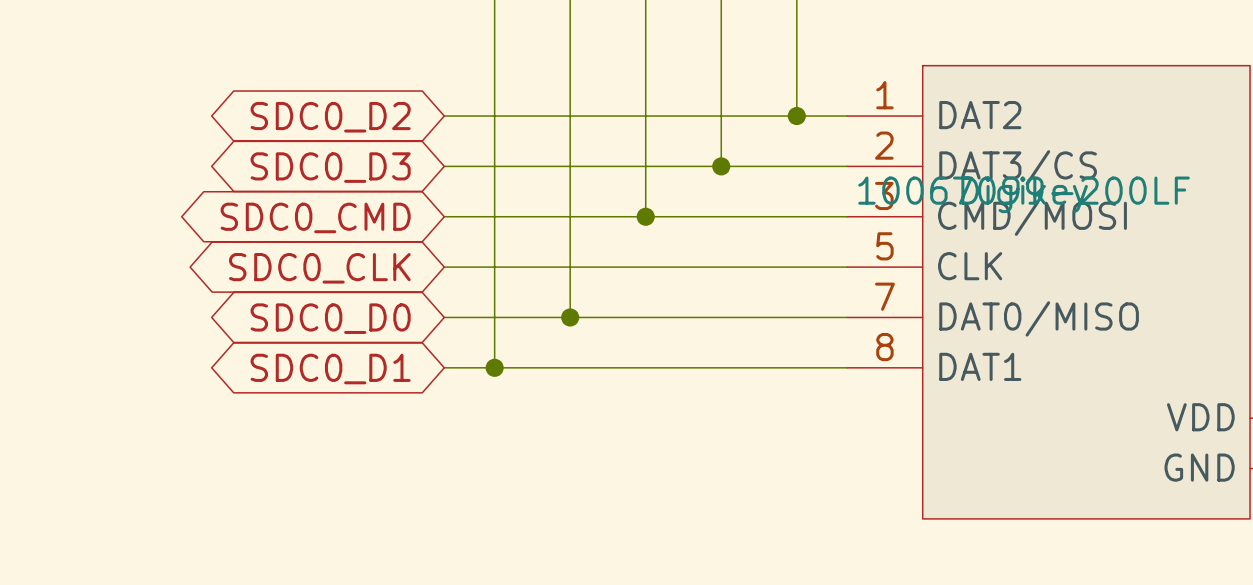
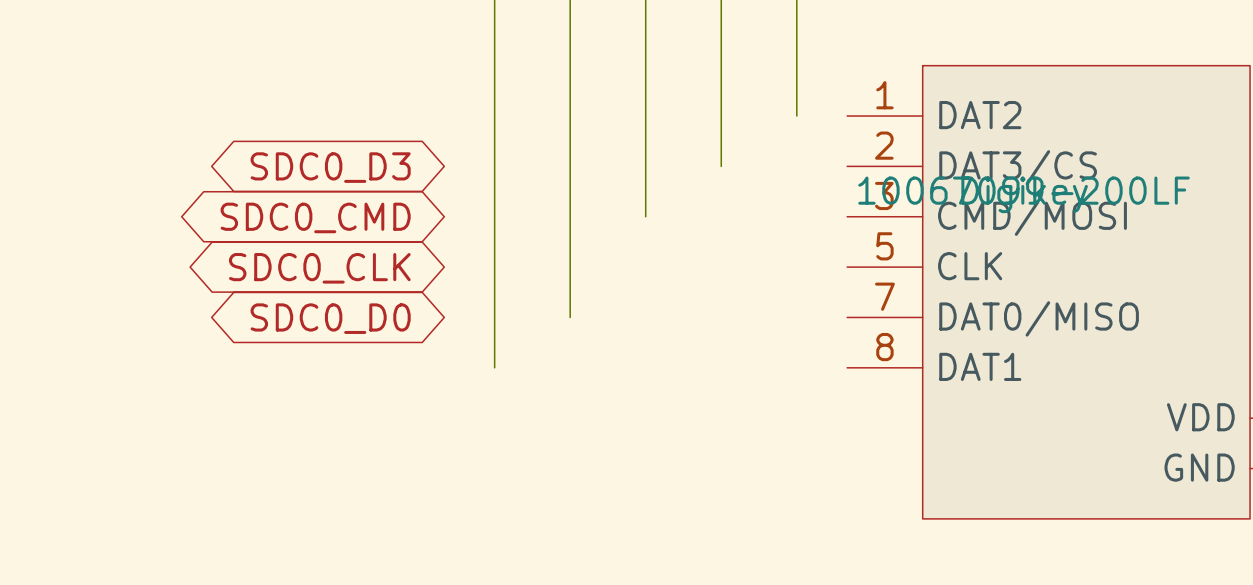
wire: (444, 116) (847, 116) -> none
junction: (796, 116) -> none
global label: SDC0_D2 (330, 117) -> none
wire: (444, 166) (847, 166) -> none
junction: (721, 166) -> none
wire: (444, 216) (847, 216) -> none
junction: (645, 216) -> none
wire: (444, 267) (847, 267) -> none
wire: (444, 317) (847, 317) -> none
junction: (570, 317) -> none
wire: (444, 367) (847, 367) -> none
junction: (494, 367) -> none
global label: SDC0_D1 (330, 369) -> none

